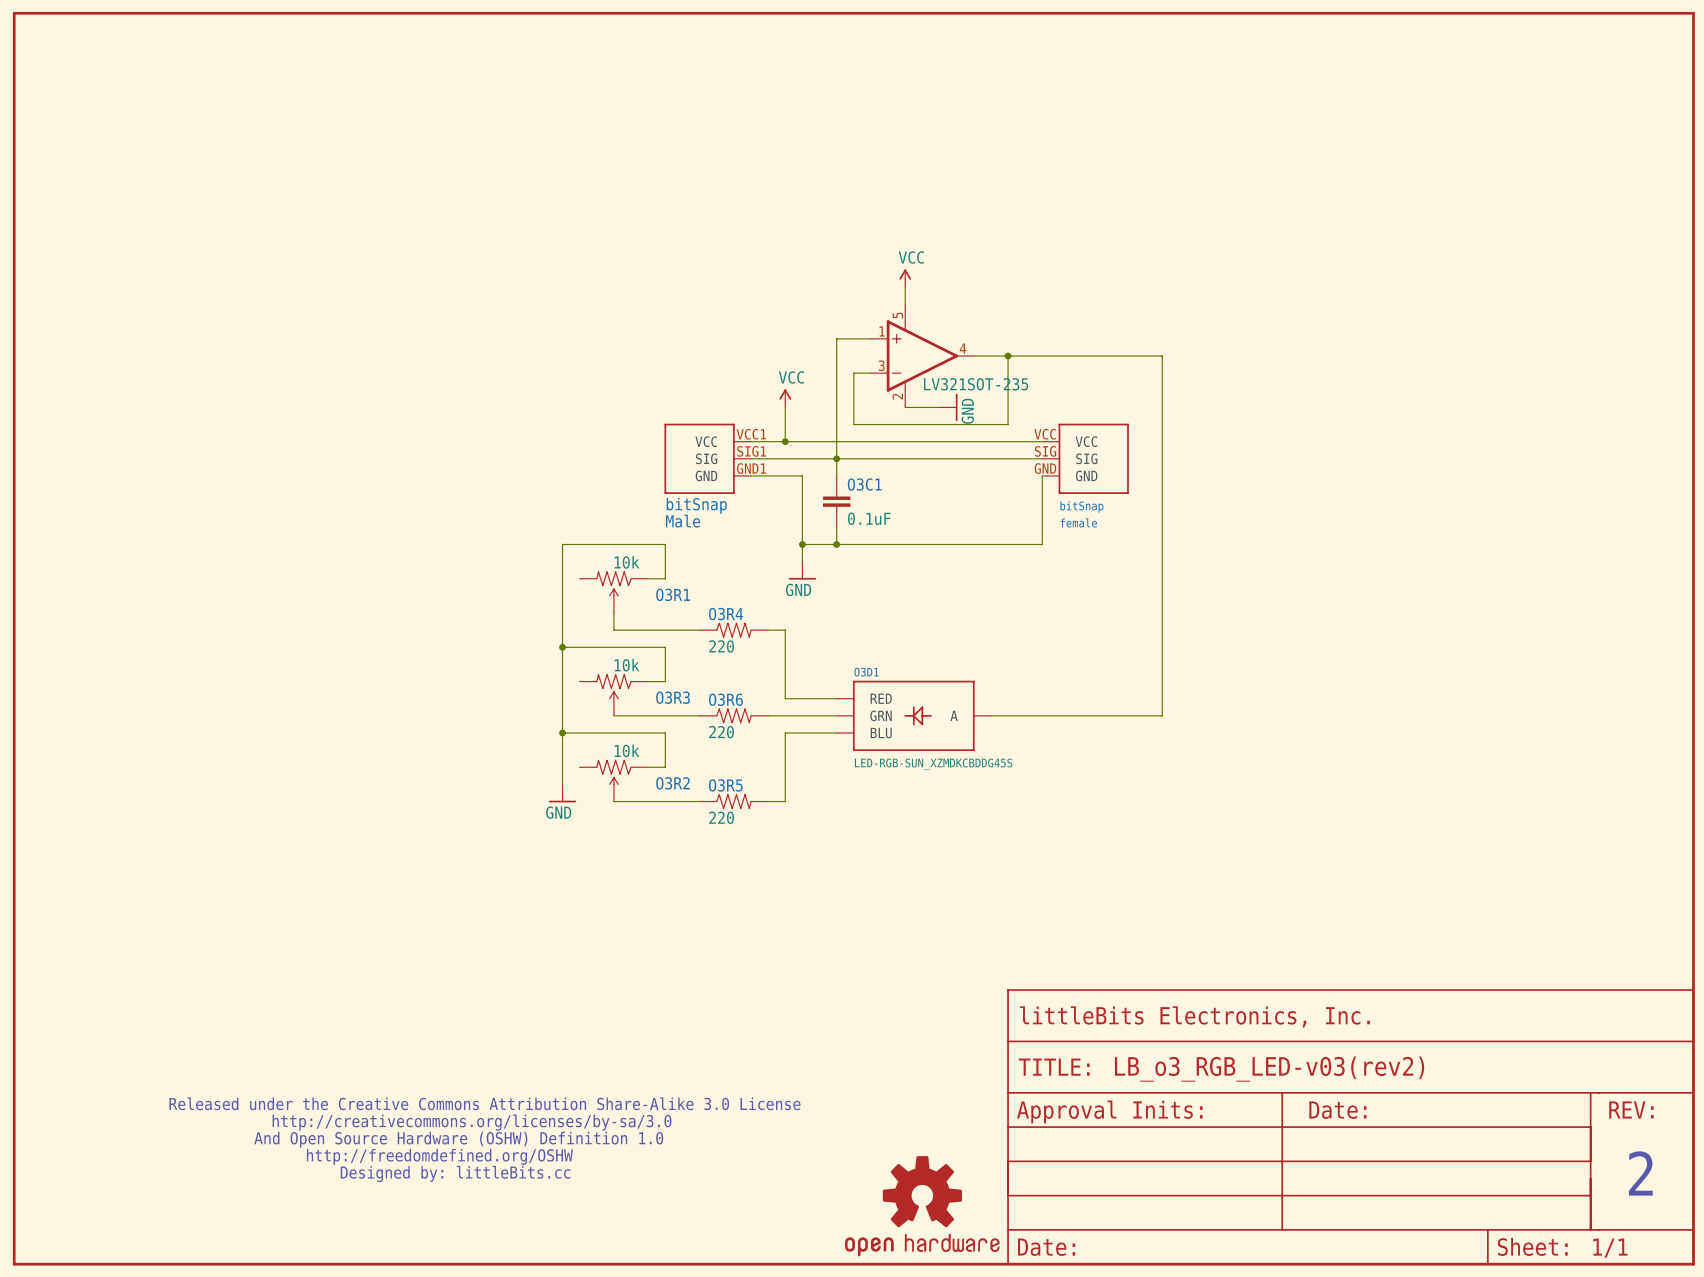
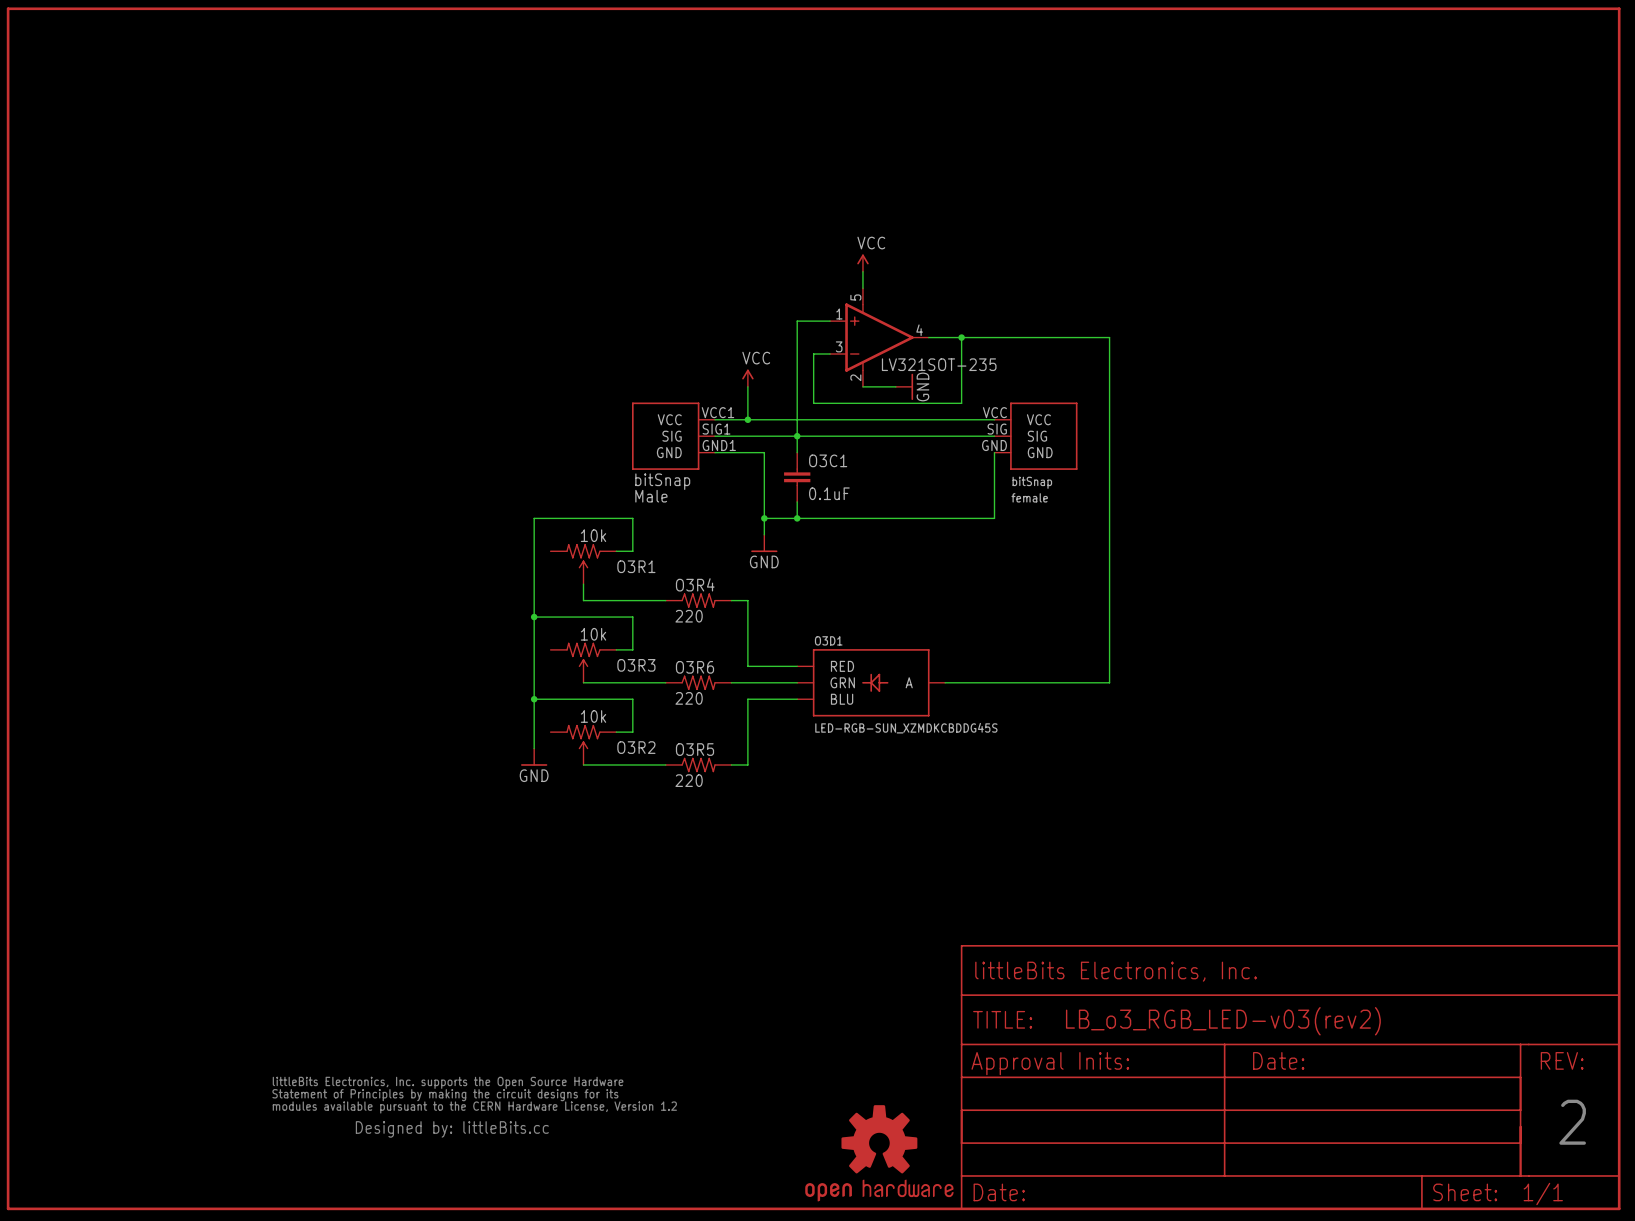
part: (484, 1139) -> none
part: none -> (474, 1107)

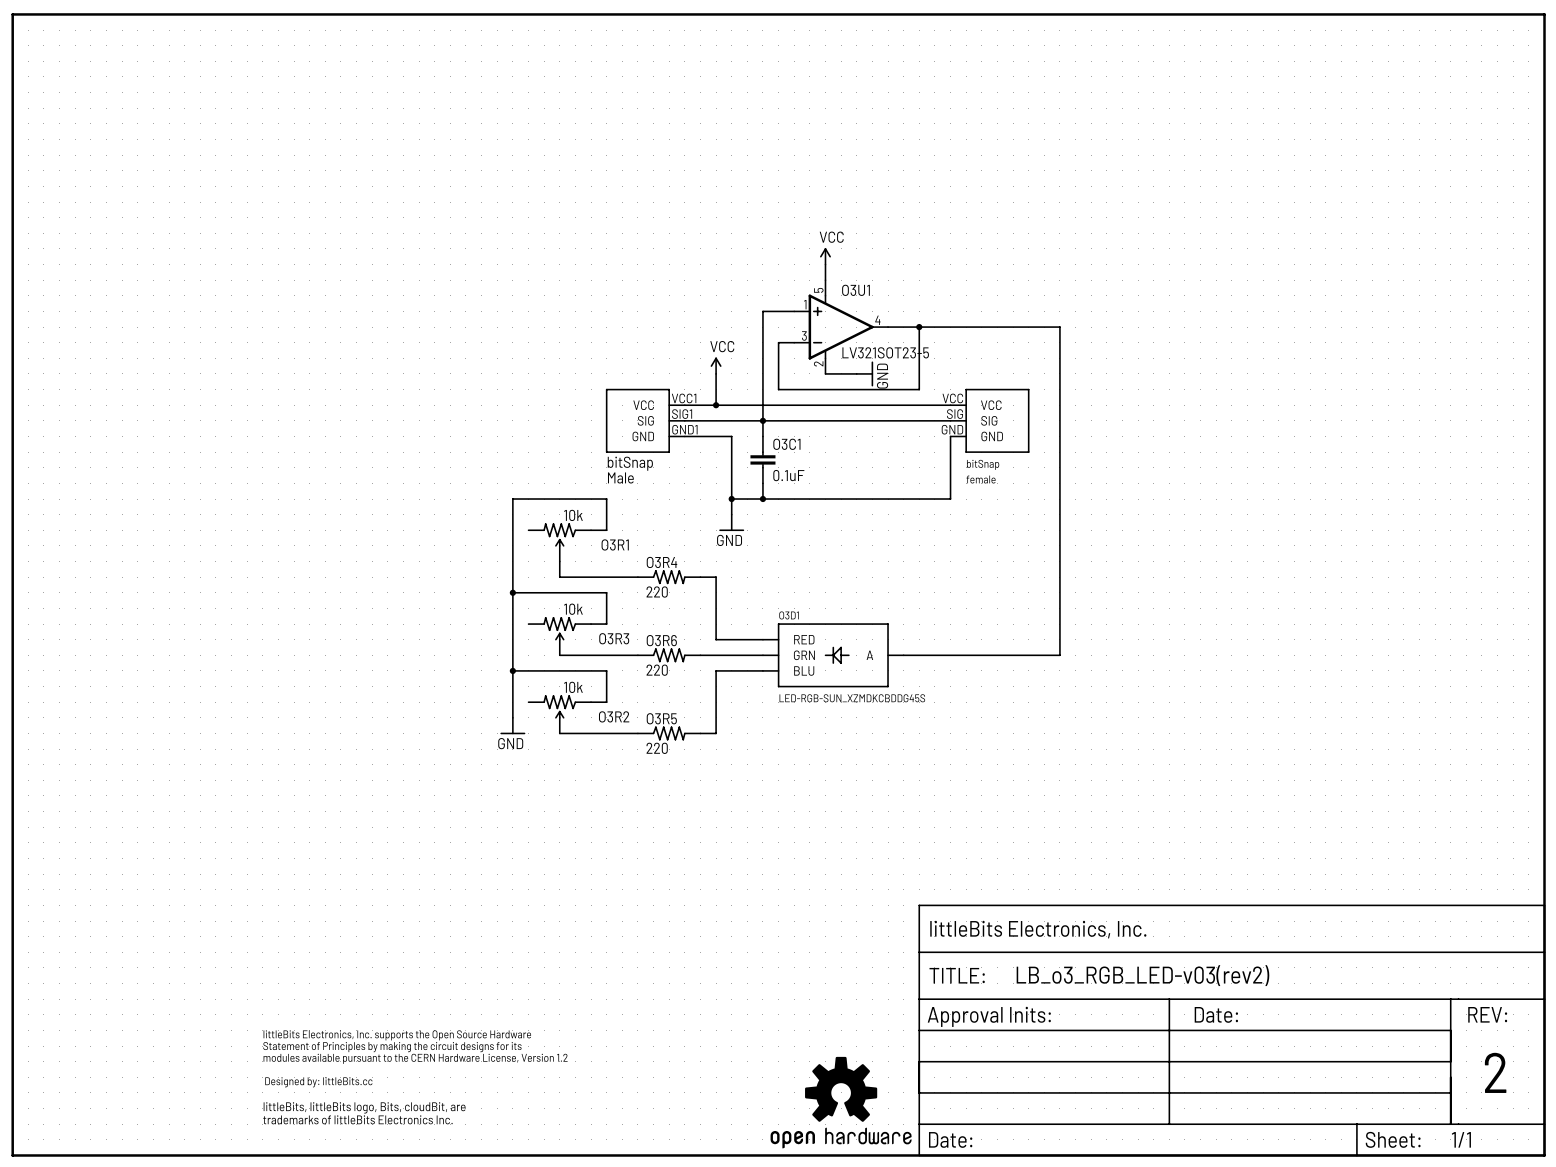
O3U1 name: none -> O3U1 (855, 290)
O3U1 value: LV321SOT-235 (939, 364) -> LV321SOT23-5 (885, 352)
part: (474, 1107) -> none
part: none -> (415, 1077)

